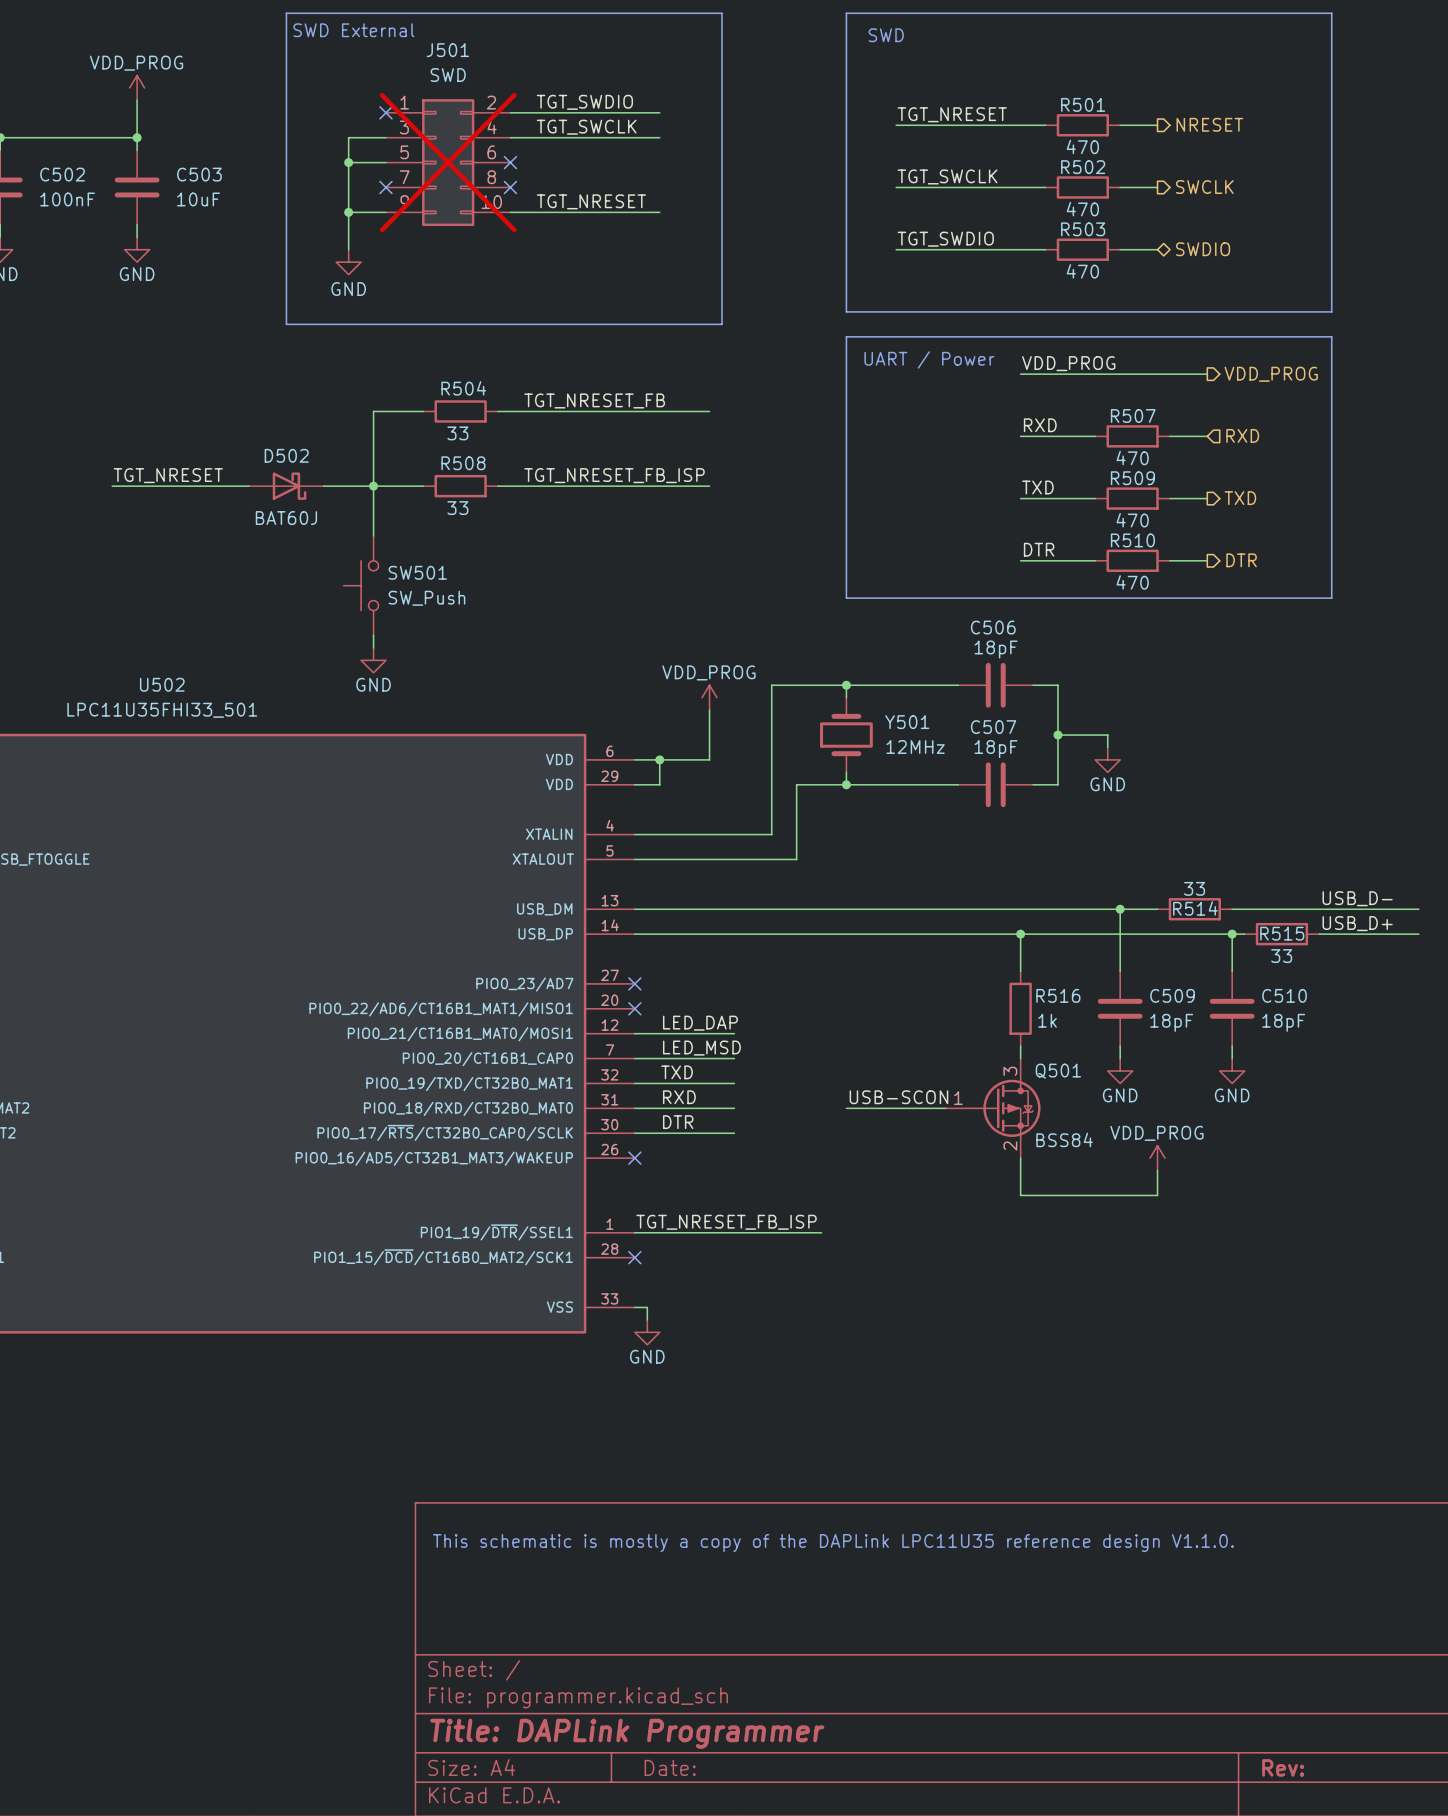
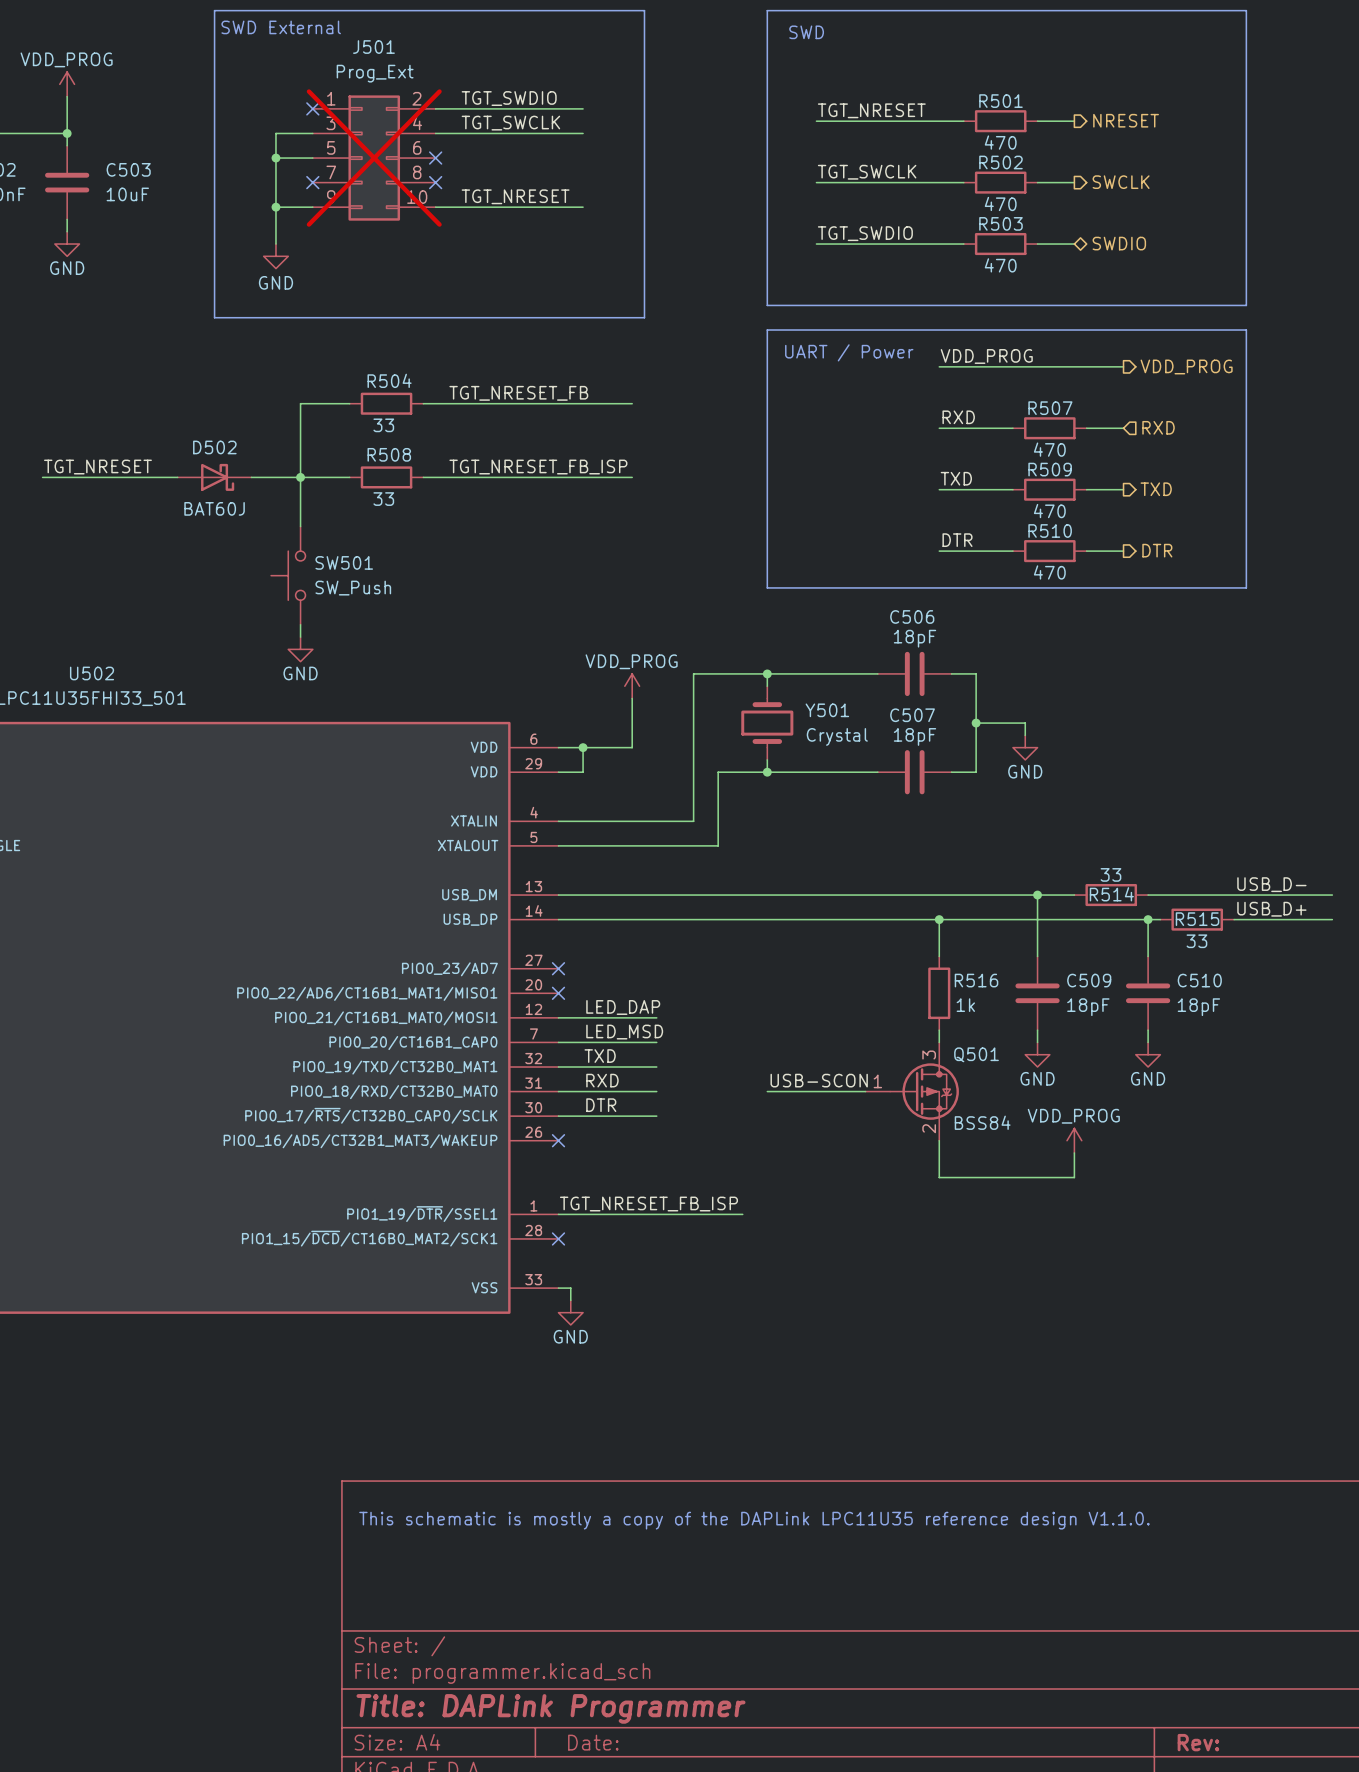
J501 value: SWD (448, 75) -> Prog_Ext (375, 73)
Y501 value: 12MHz (915, 747) -> Crystal (837, 736)

